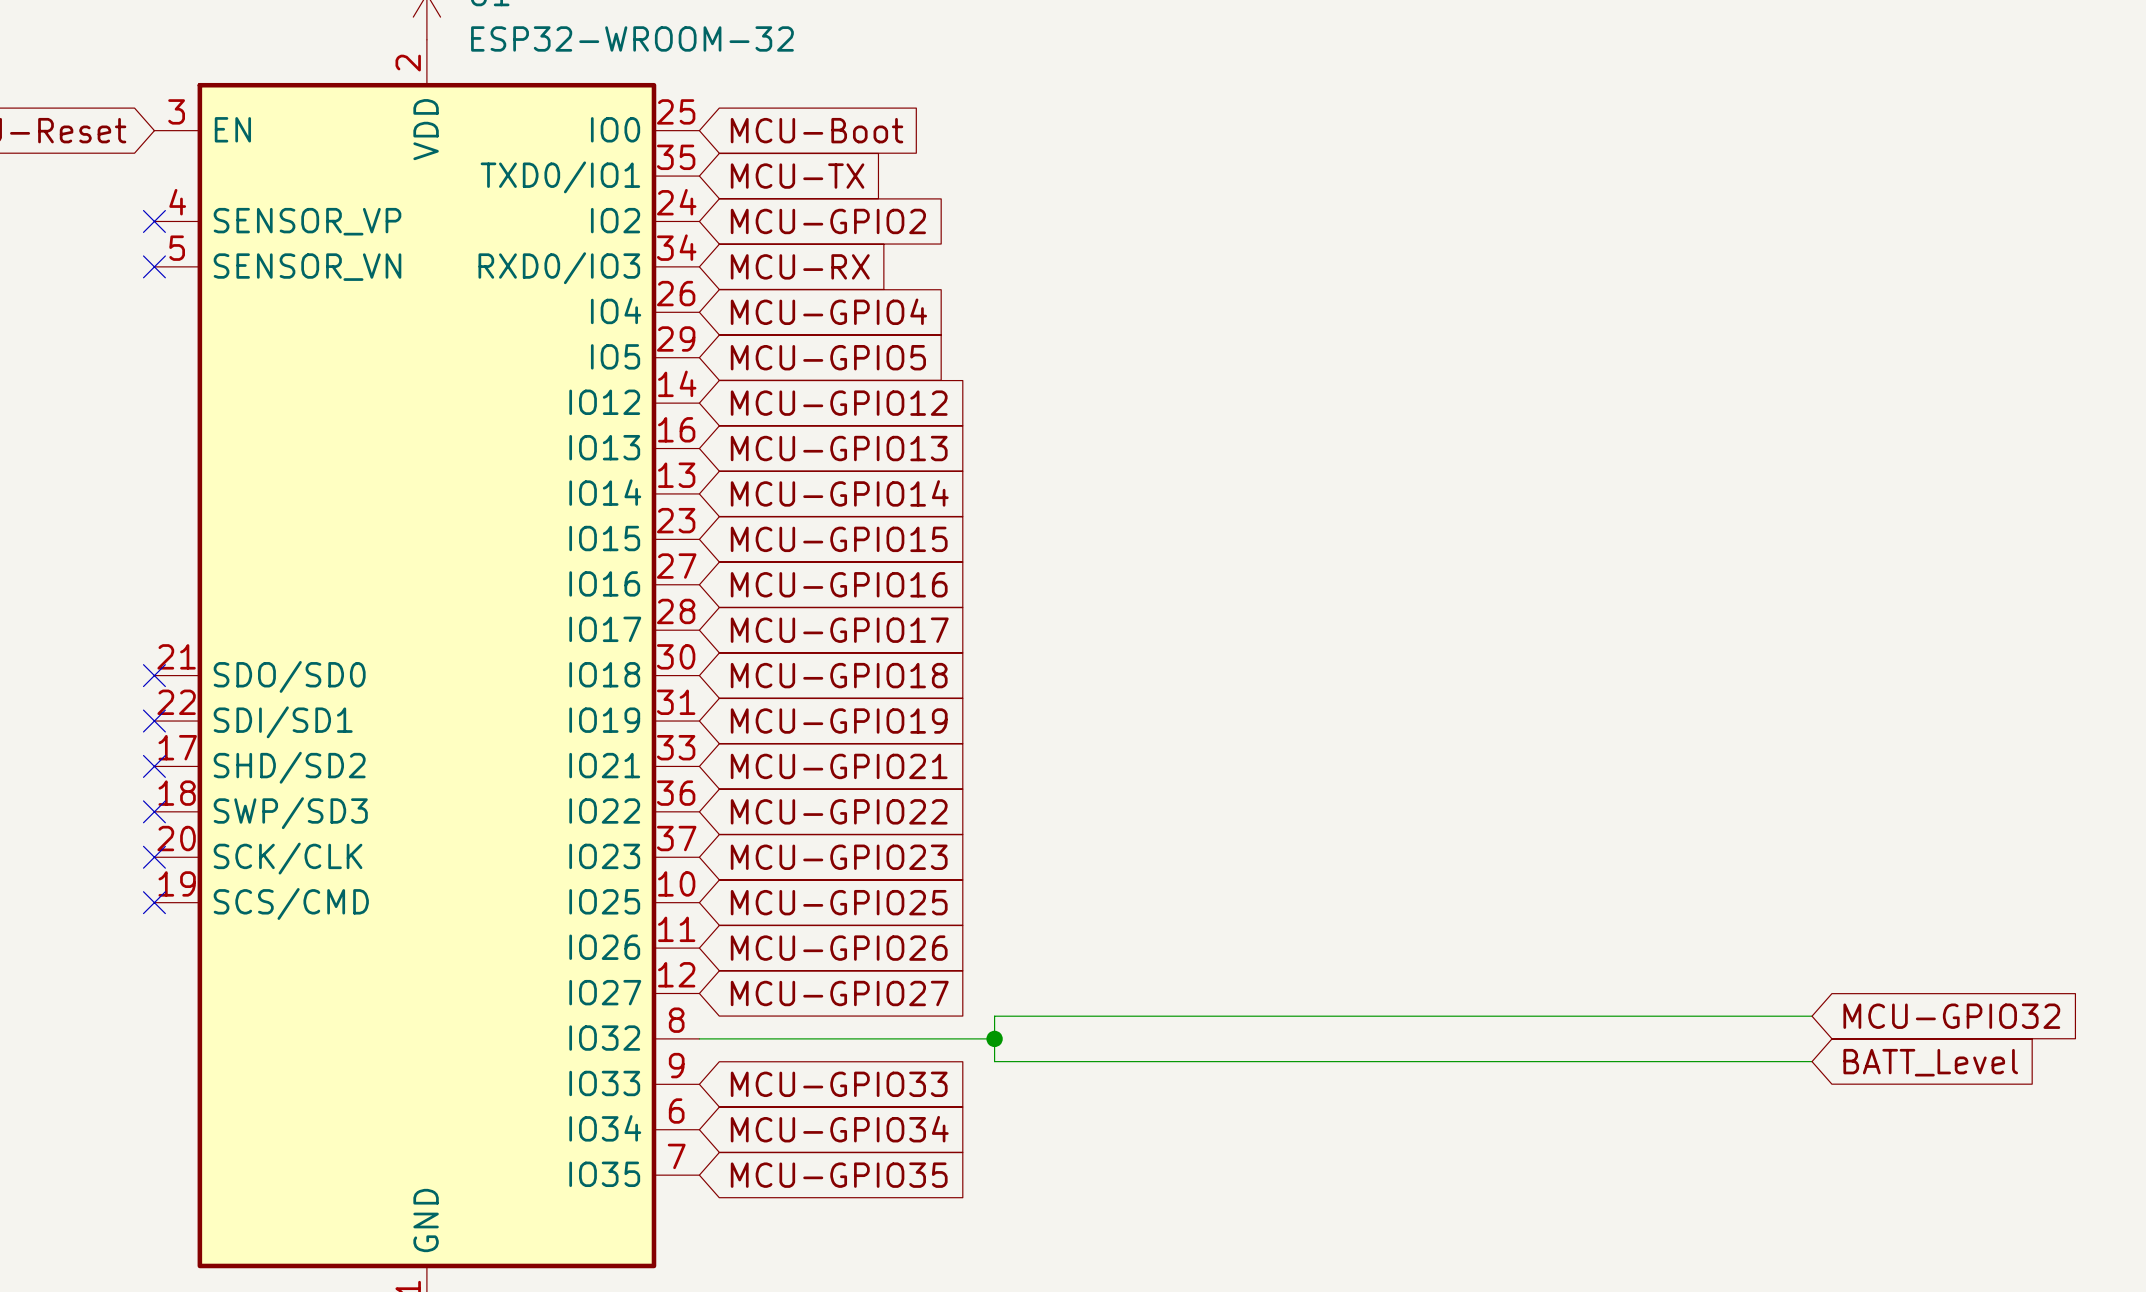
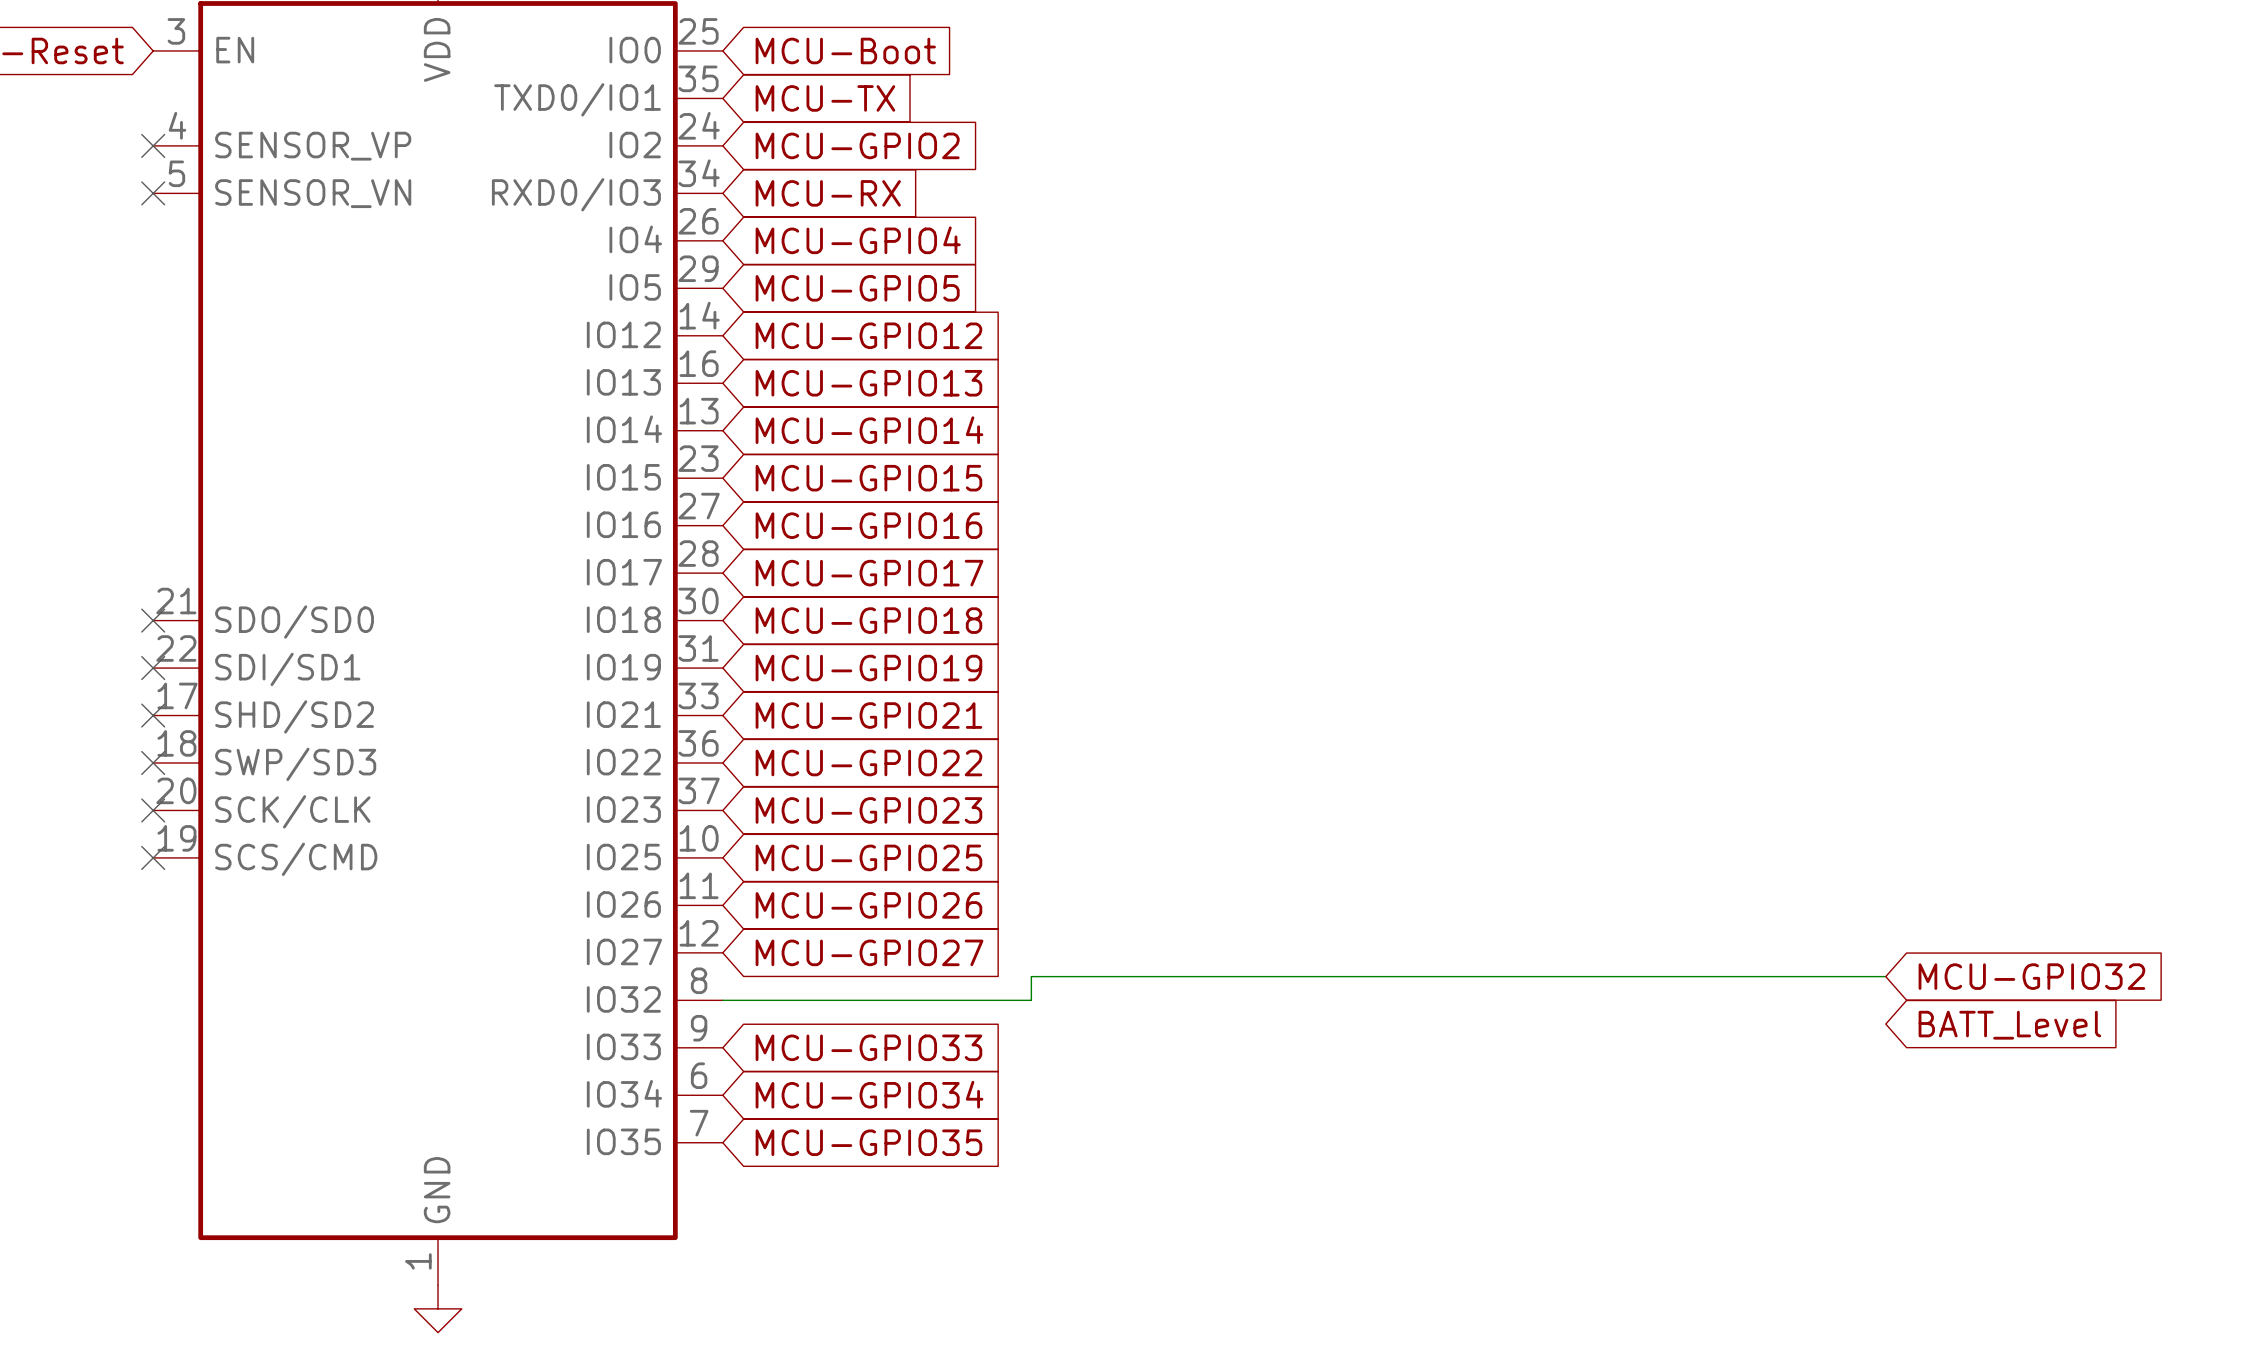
wire: (994, 1038) (994, 1061) (1812, 1061) -> none
junction: (994, 1038) -> none

